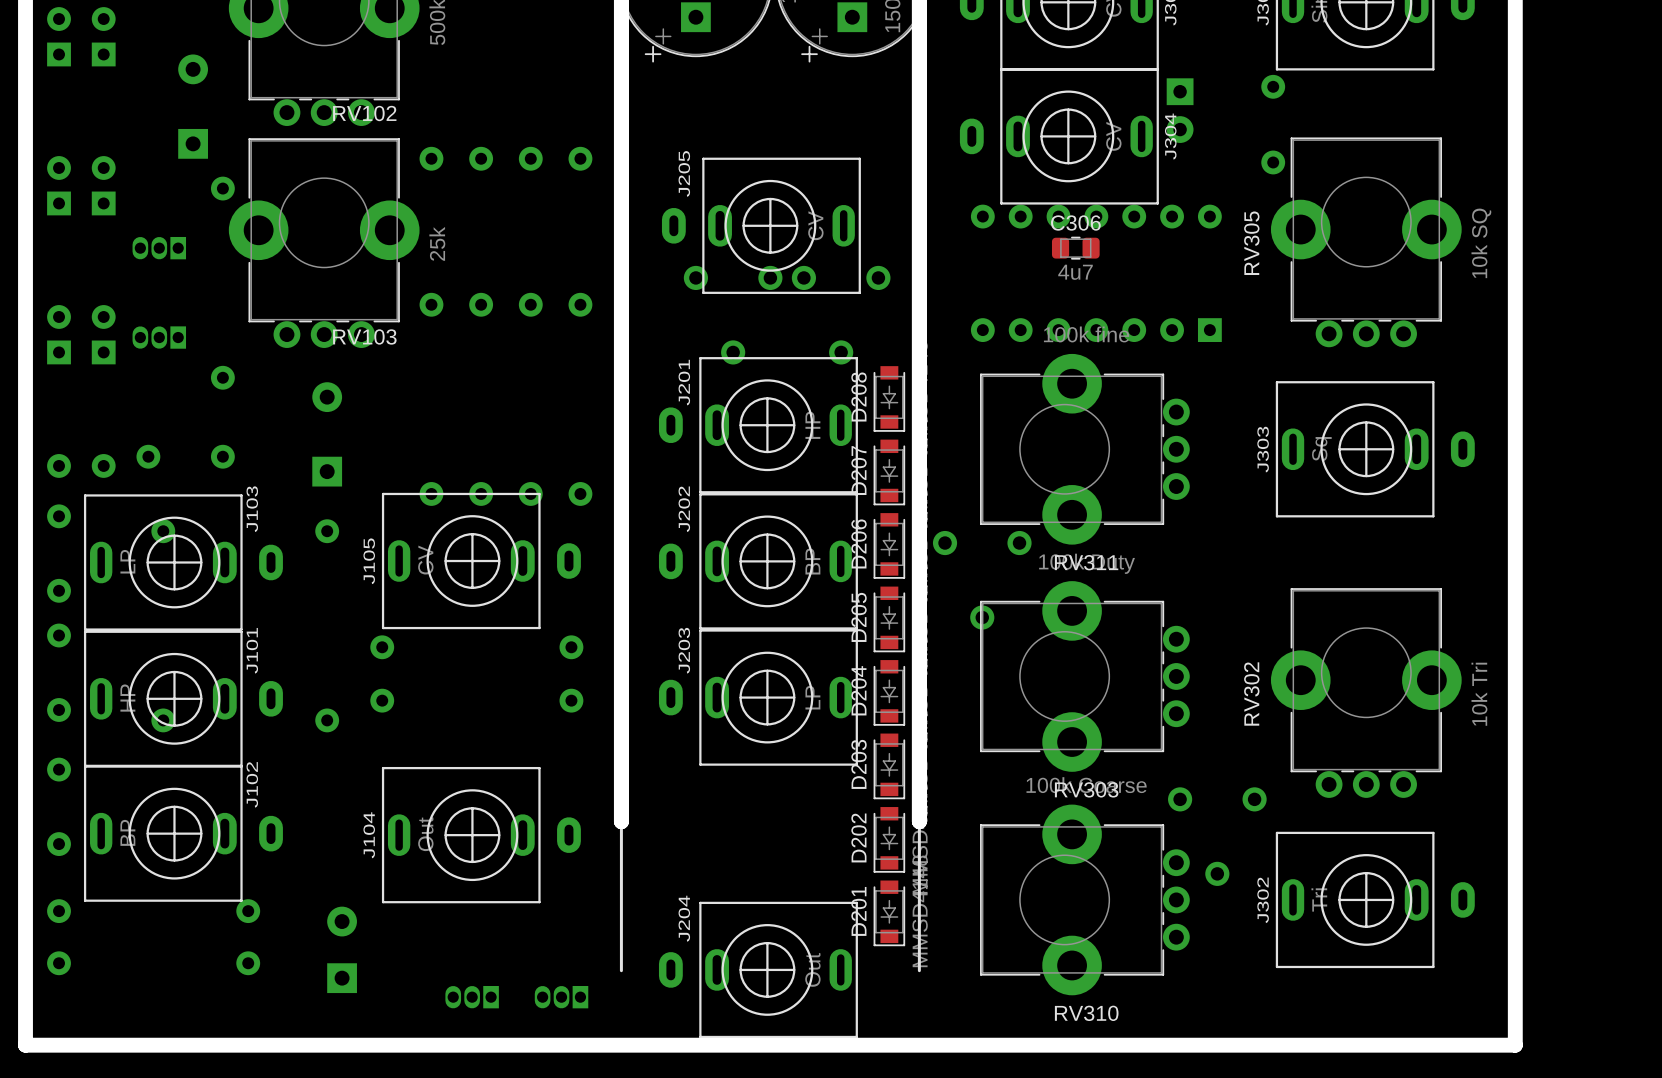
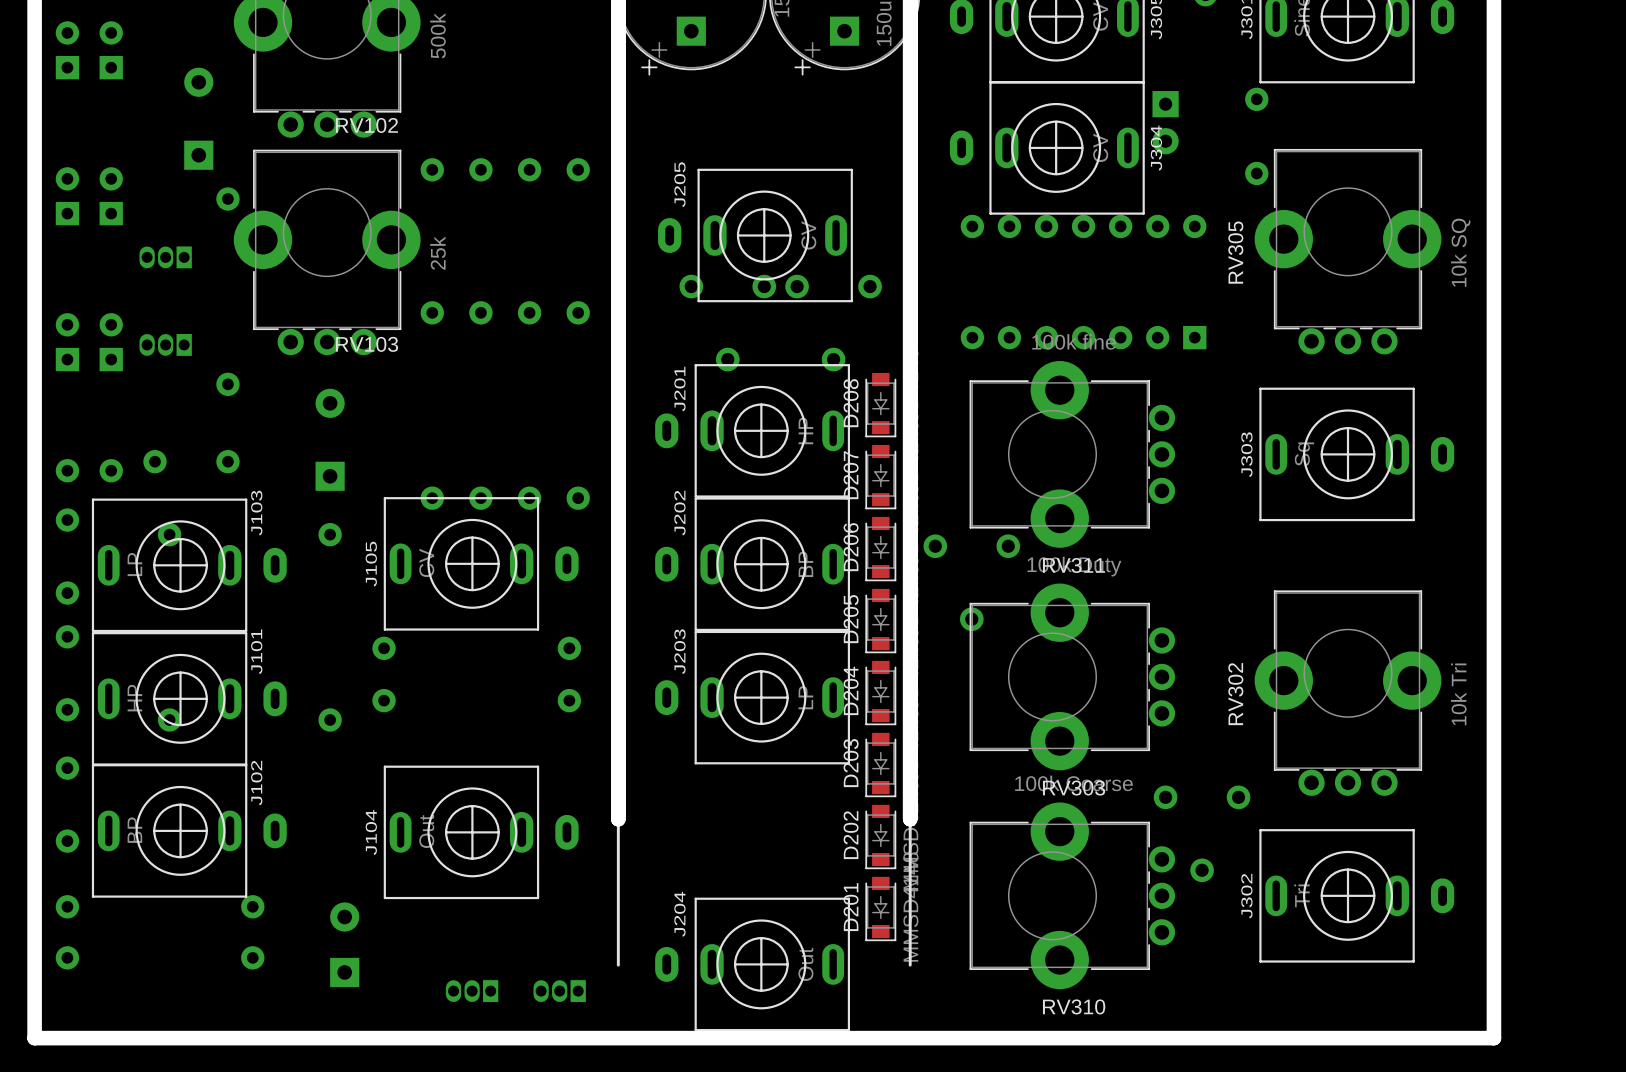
C306: 4u7 (1075, 248) -> none

